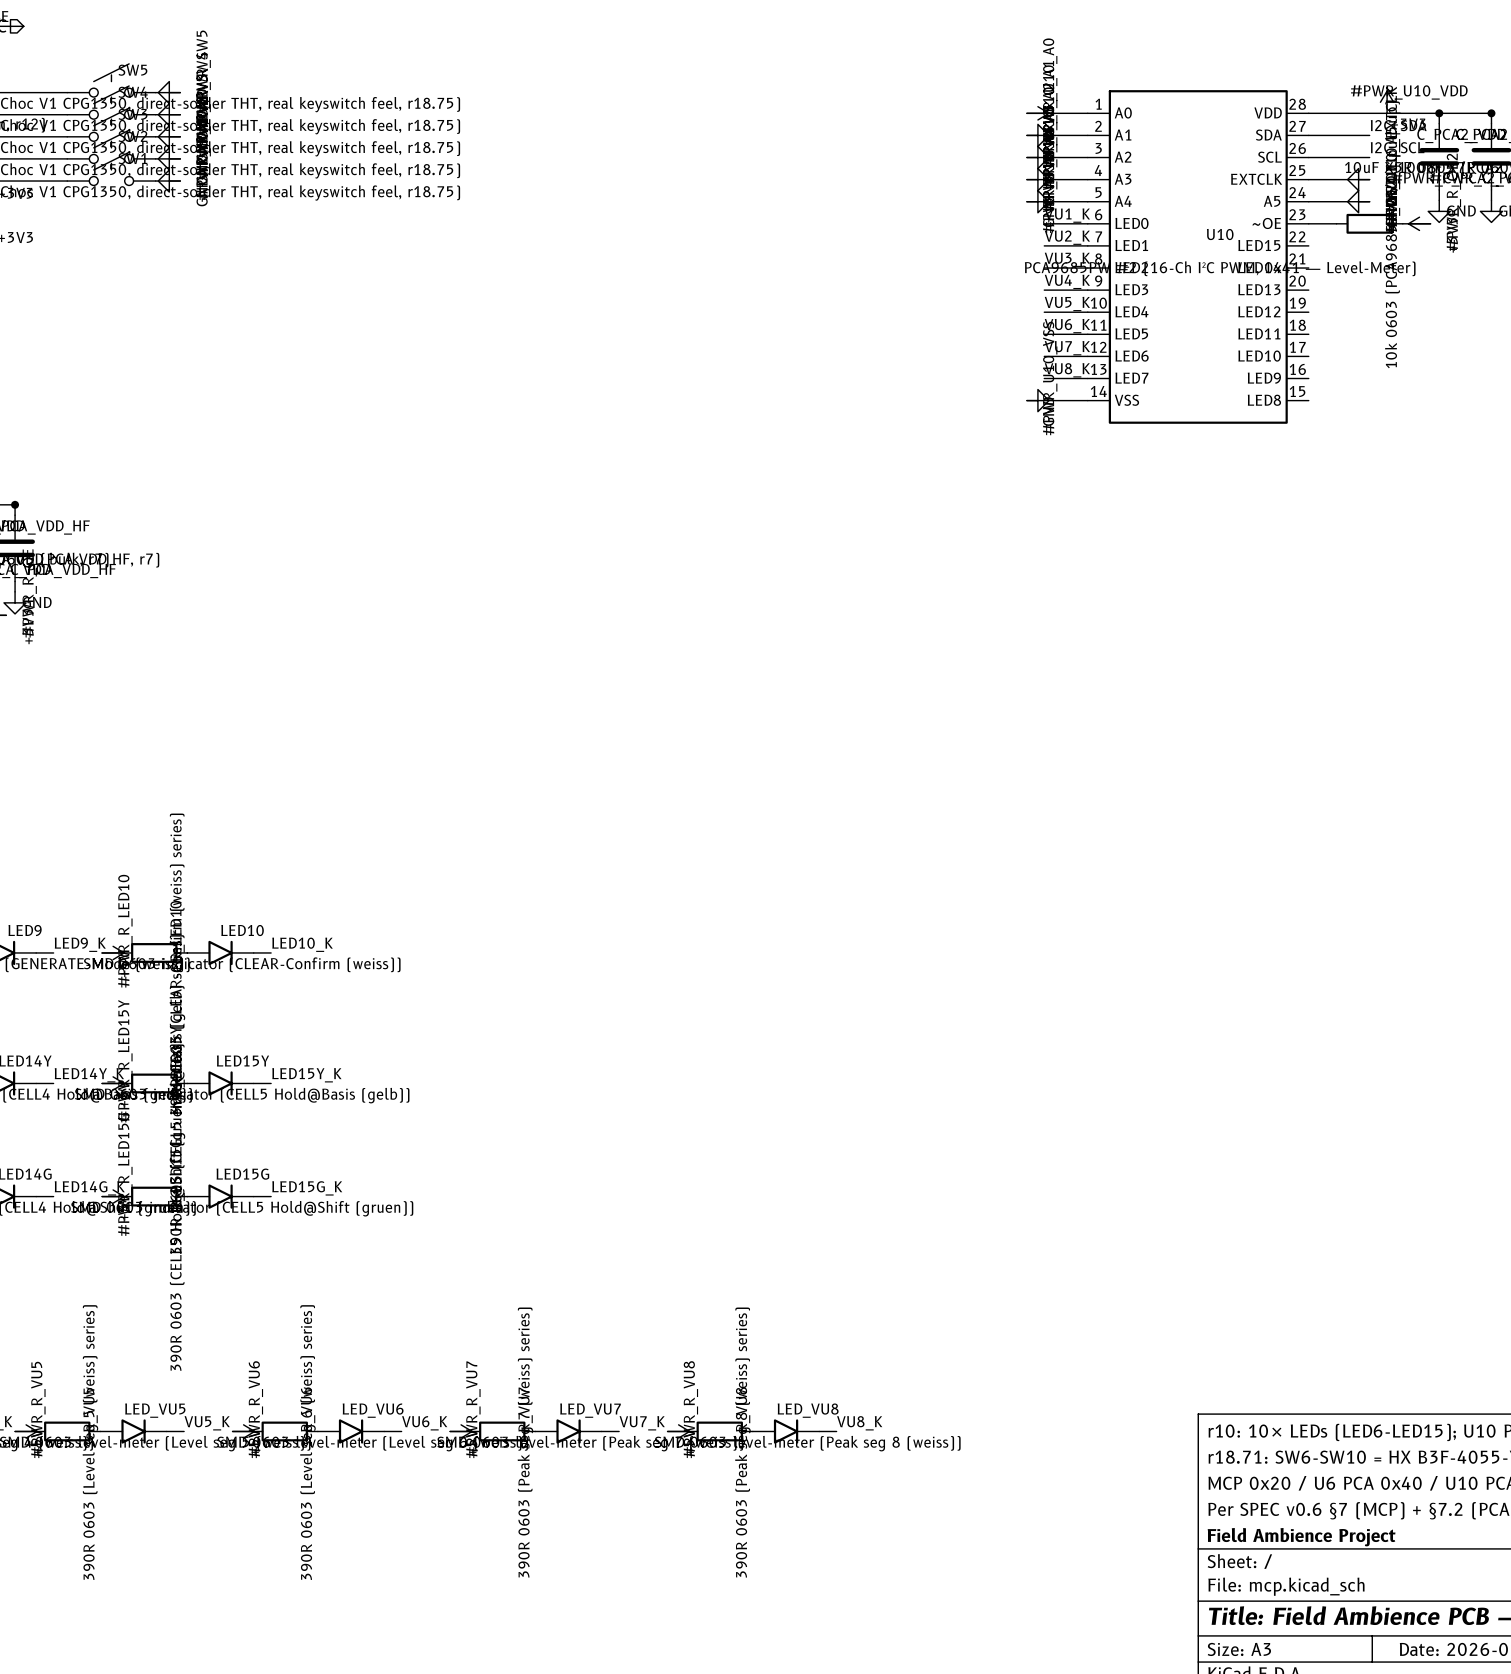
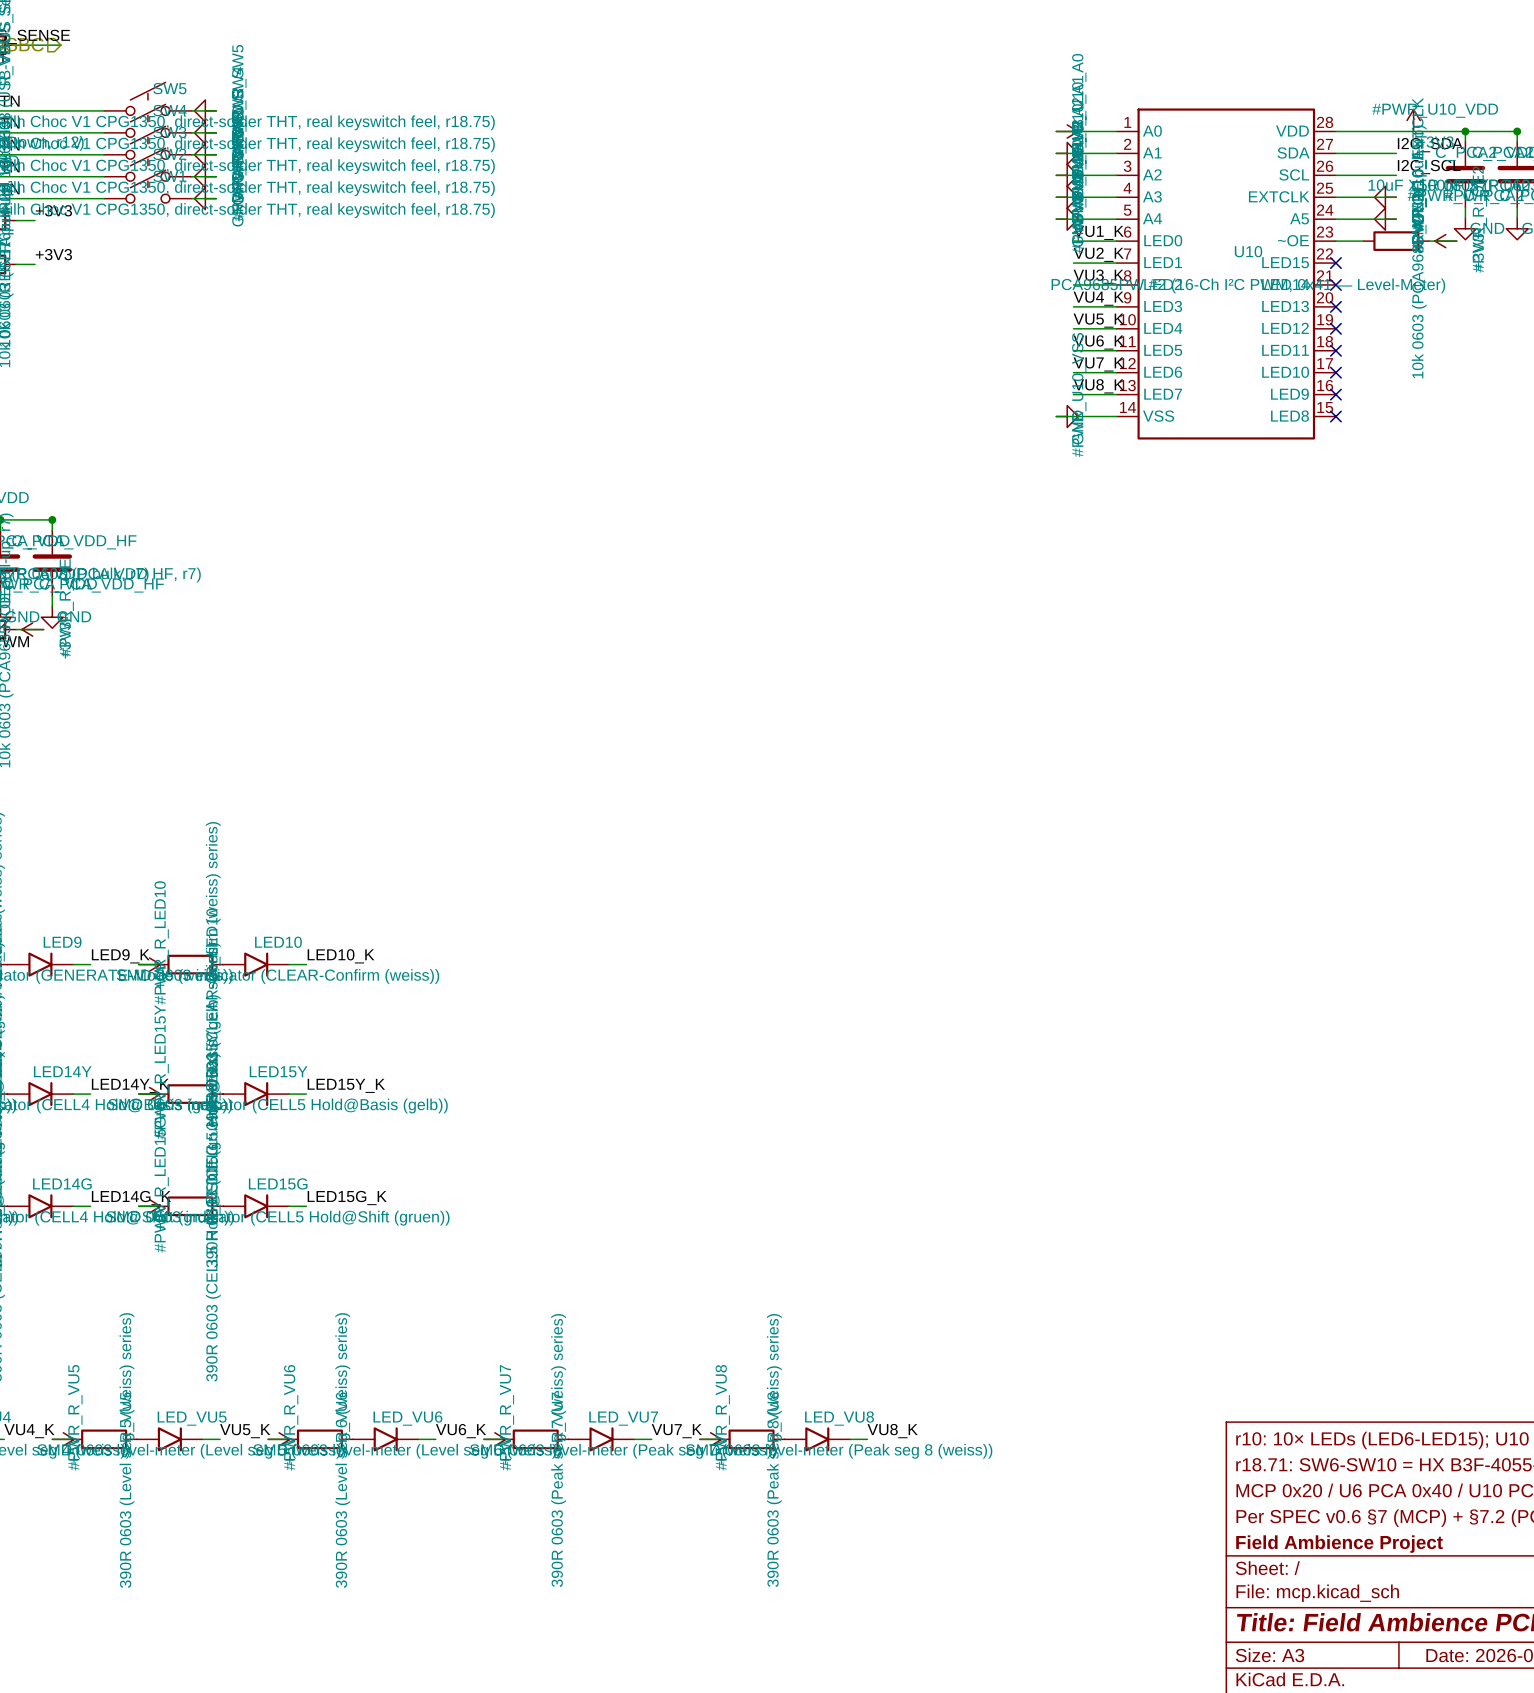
no-connect mark: none -> (1335, 263)
no-connect mark: none -> (1335, 284)
no-connect mark: none -> (1335, 306)
no-connect mark: none -> (1335, 328)
no-connect mark: none -> (1335, 350)
no-connect mark: none -> (1335, 372)
no-connect mark: none -> (1335, 394)
no-connect mark: none -> (1335, 416)

